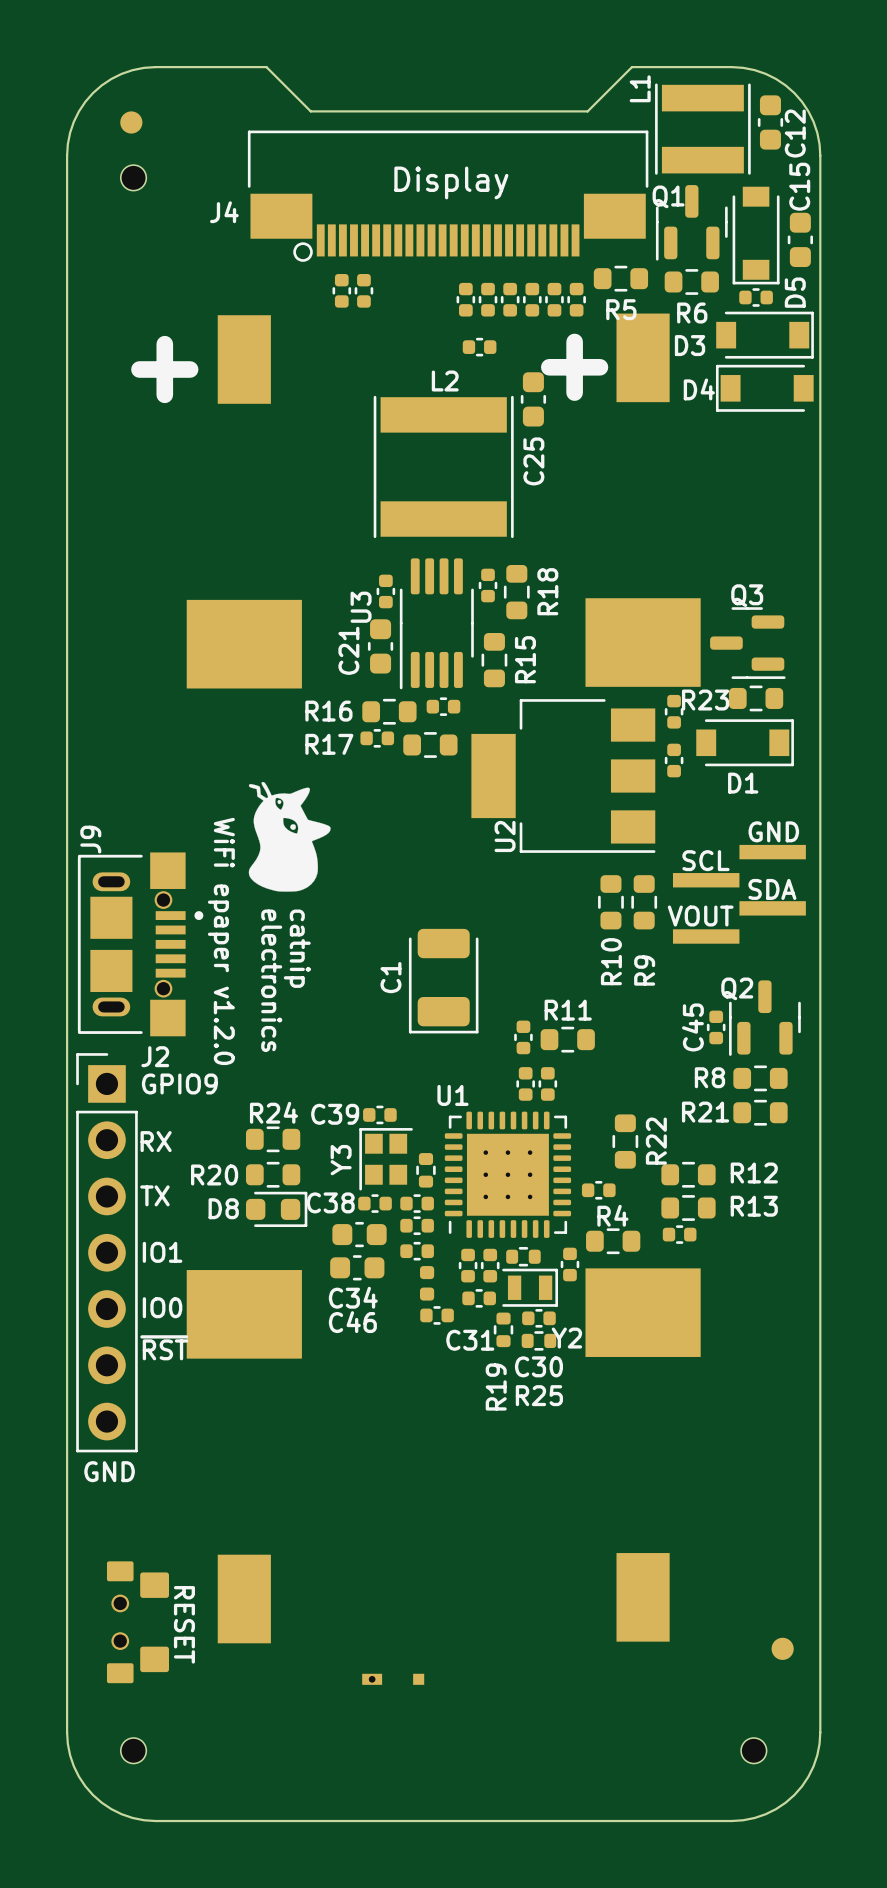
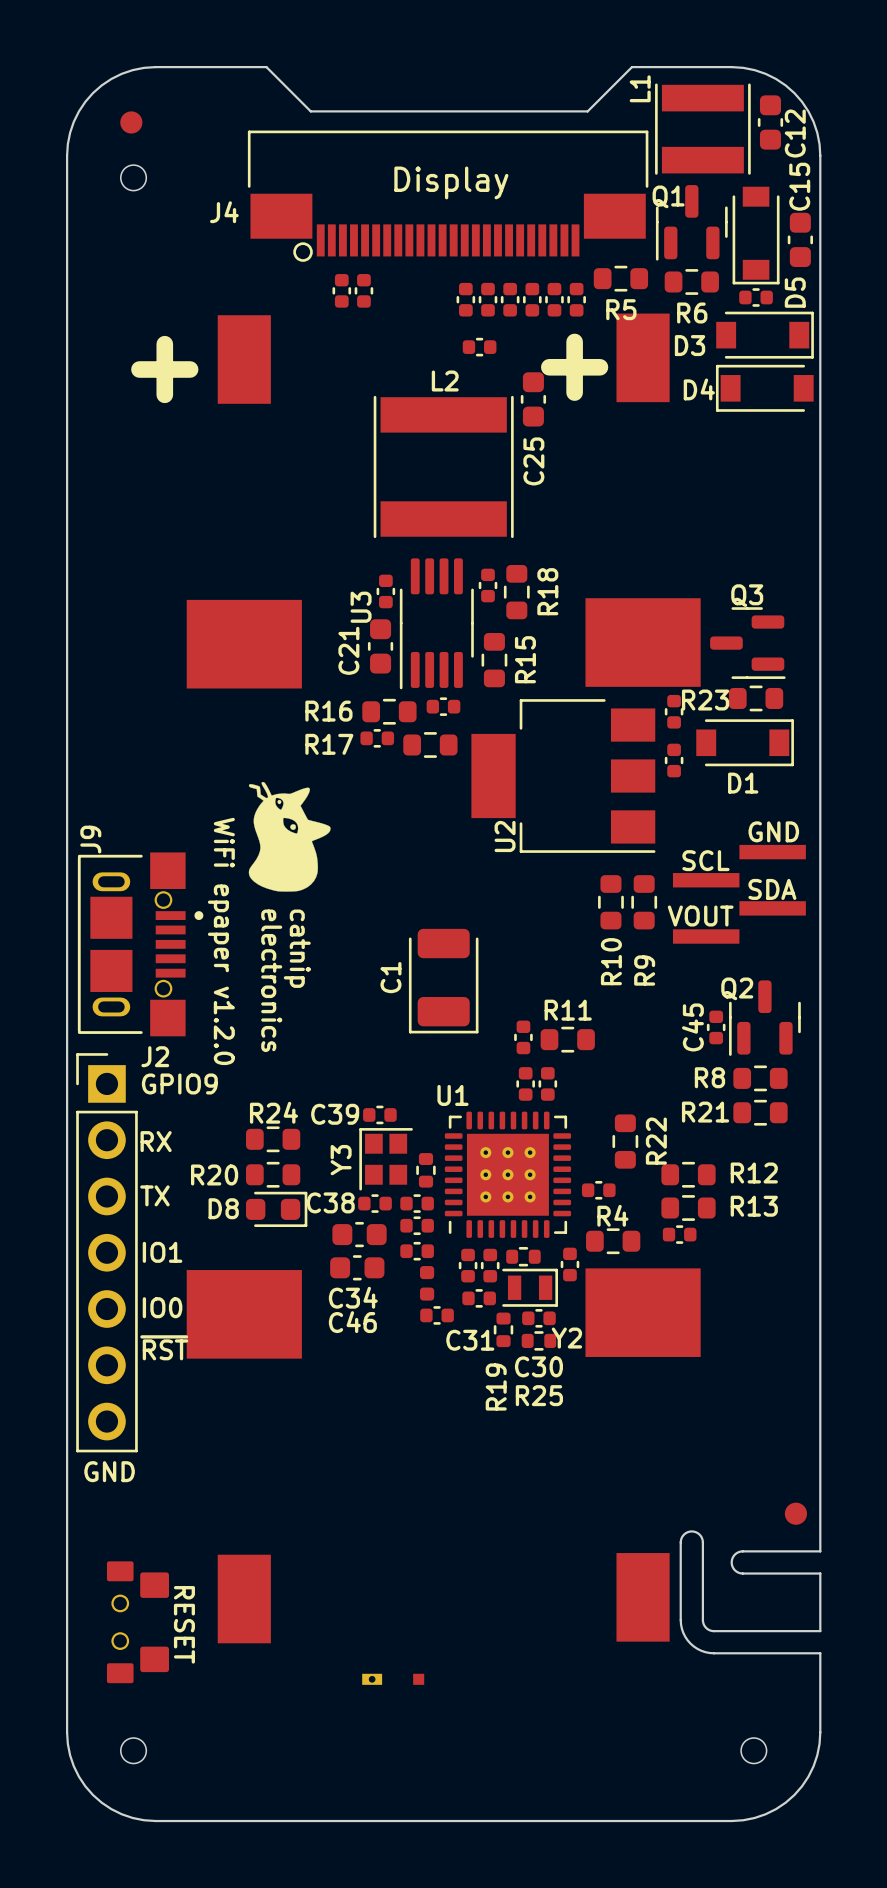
board edge: (820, 1551) (820, 1573) -> (820, 1551) (741, 1551) (734, 1554) (731, 1562) (734, 1570) (741, 1573) (820, 1573)
board edge: (820, 1631) (820, 1653) -> (820, 1631) (713, 1631) (707, 1628) (702, 1620) (702, 1539) (694, 1531) (687, 1532) (683, 1535) (680, 1542) (681, 1624) (685, 1636) (693, 1646) (701, 1650) (713, 1653) (820, 1653)
part position: (782, 1648) -> (795, 1513)

